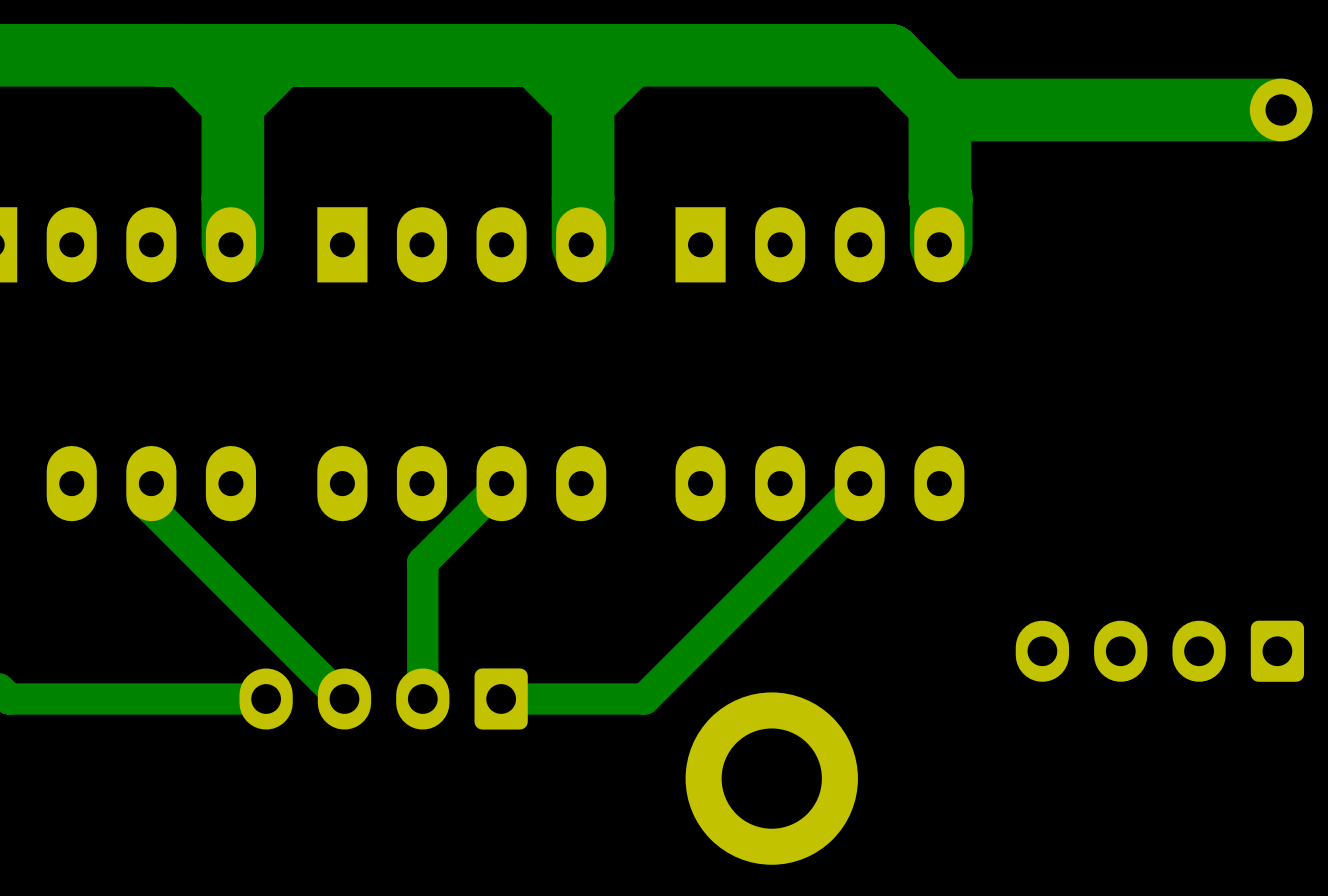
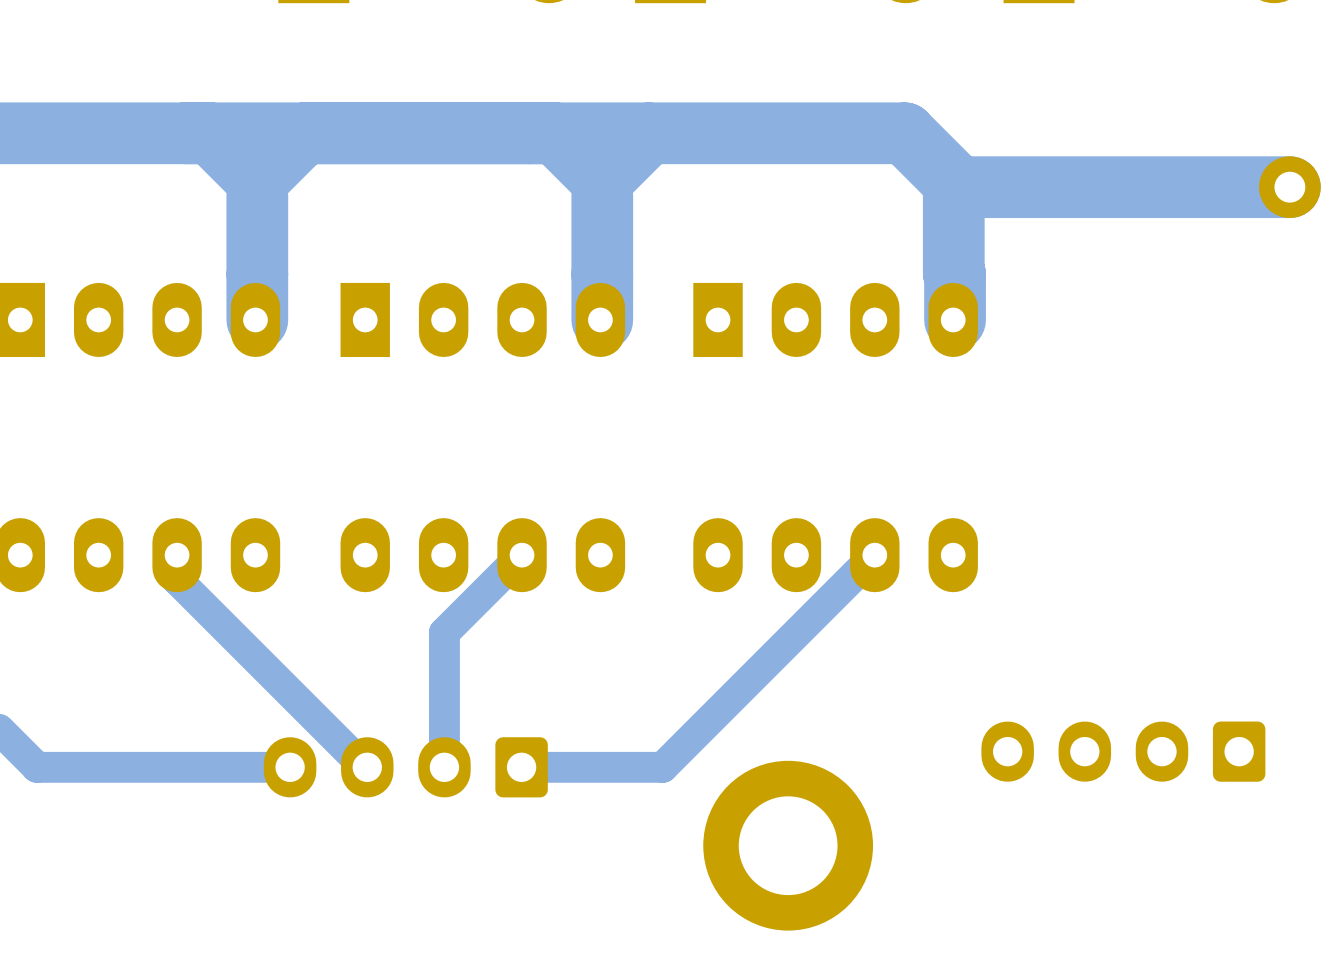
part position: (1159, 651) -> (1123, 751)

